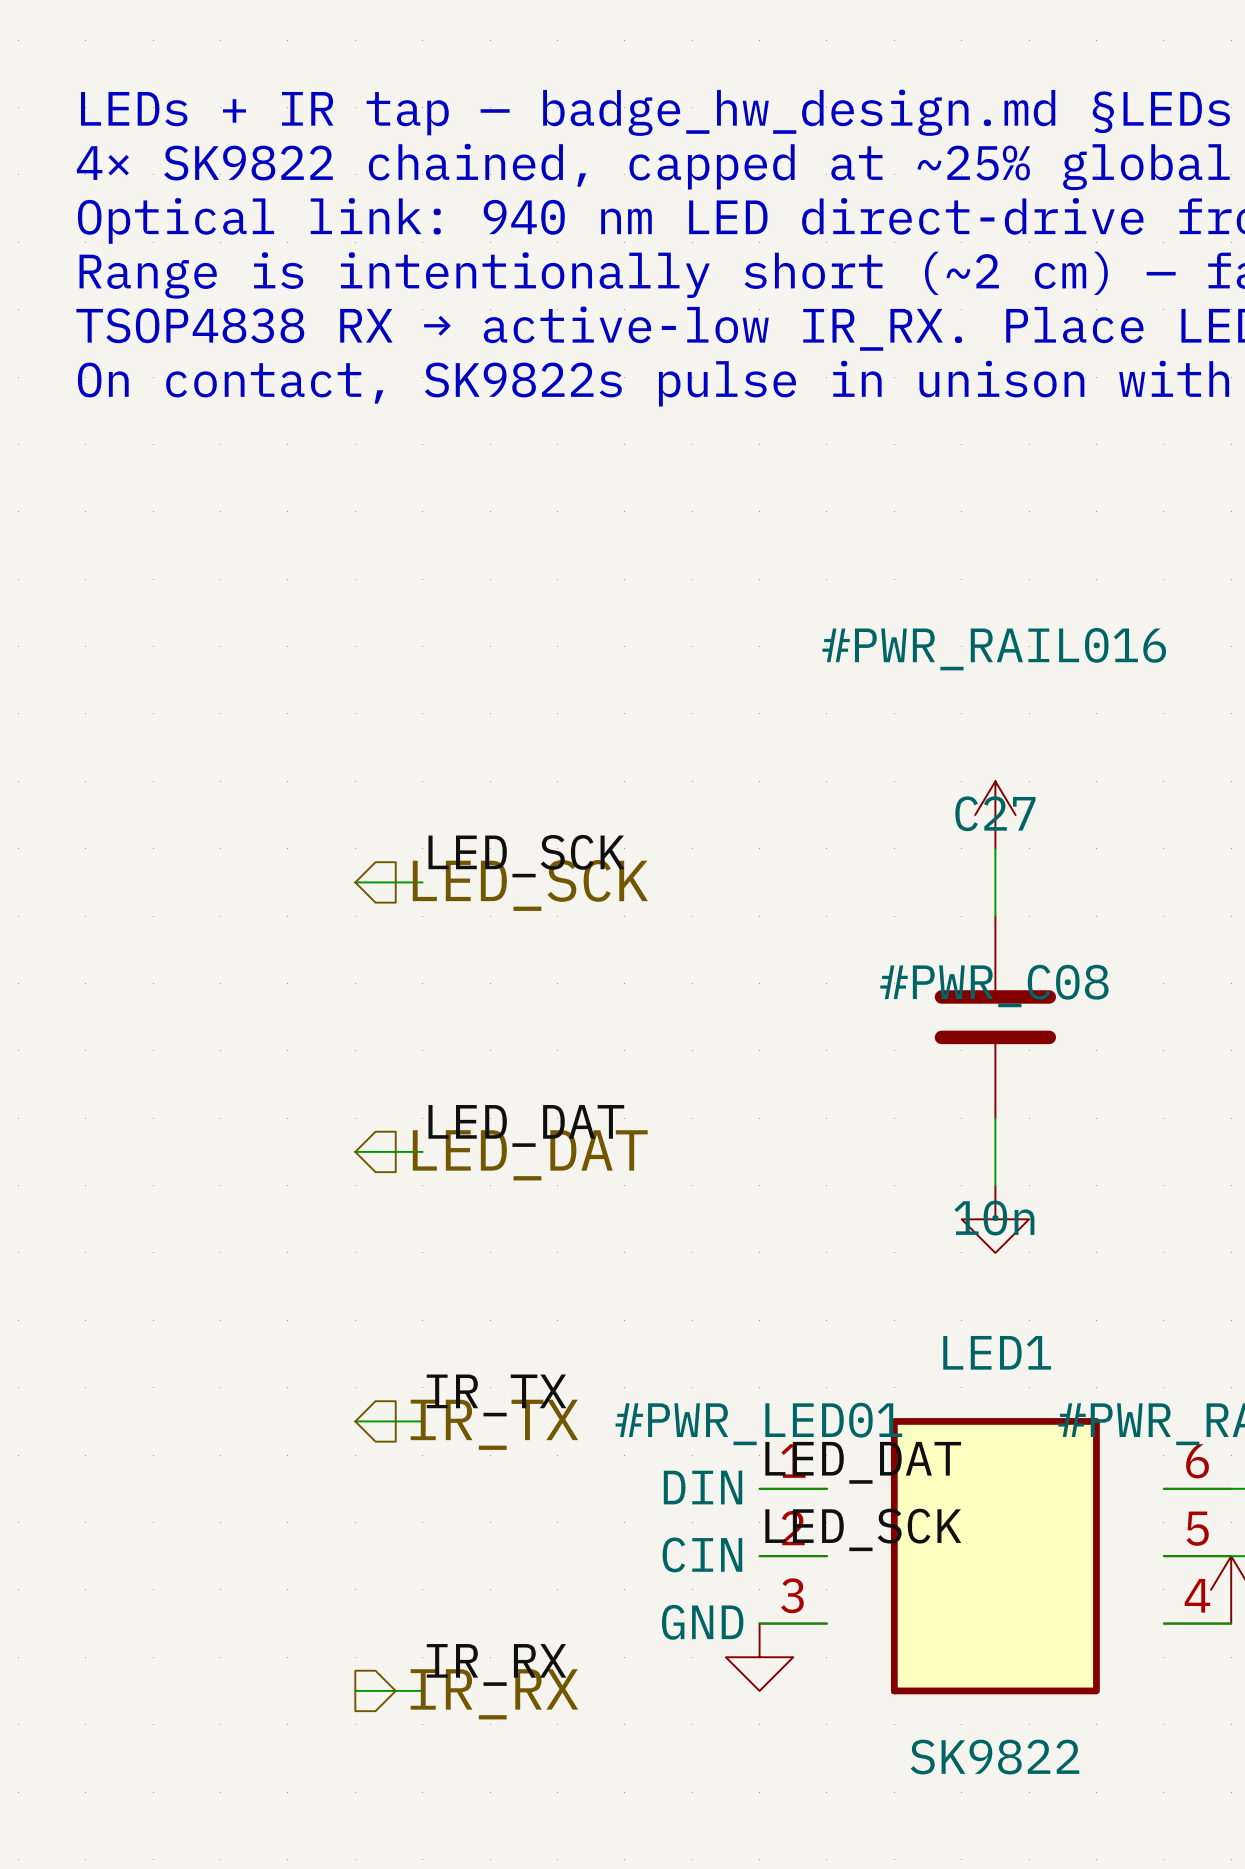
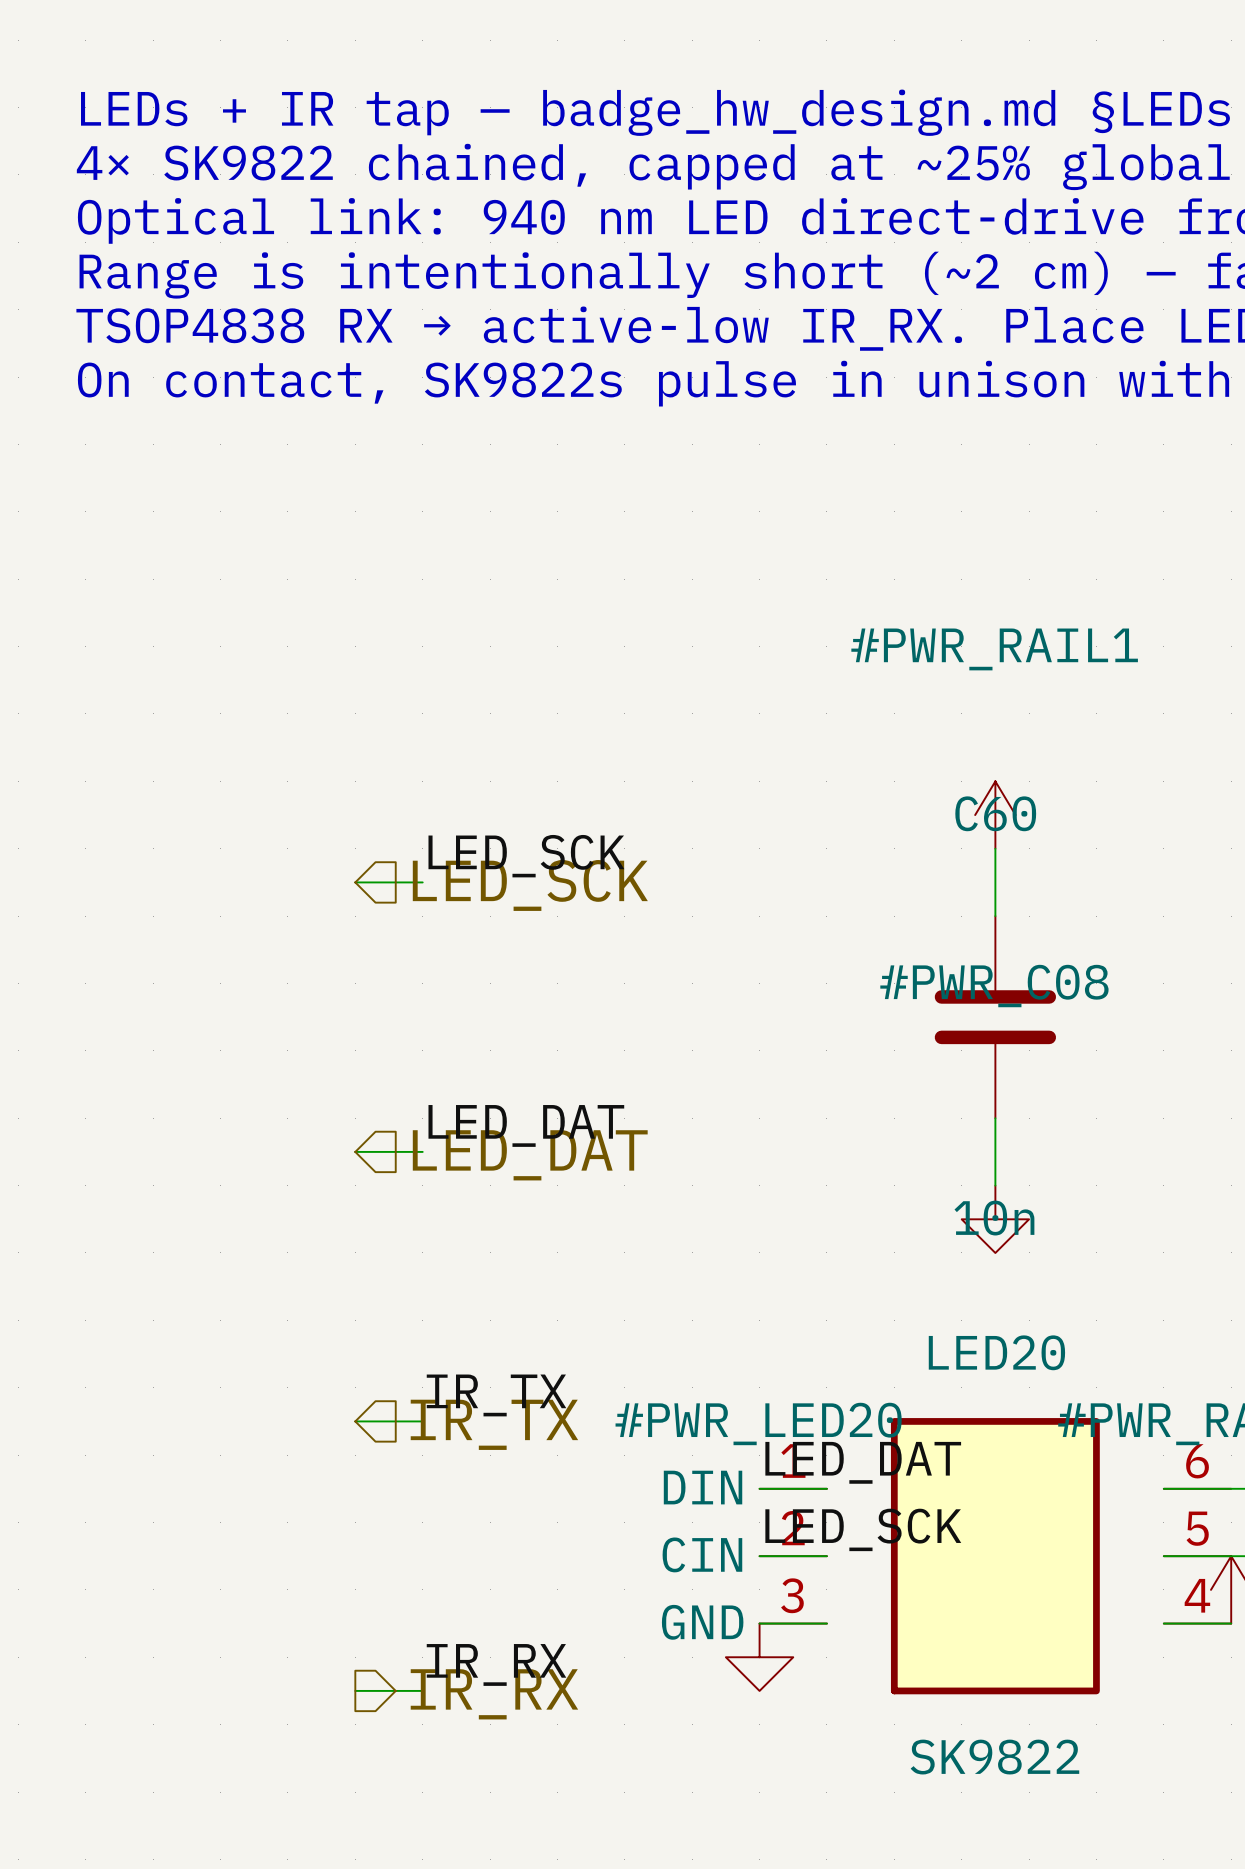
#PWR_RAIL016 name: #PWR_RAIL016 (994, 649) -> #PWR_RAIL1 (994, 649)
C27 name: C27 (995, 813) -> C60 (995, 813)
LED1 name: LED1 (997, 1352) -> LED20 (996, 1352)
#PWR_LED01 name: #PWR_LED01 (758, 1423) -> #PWR_LED20 (758, 1423)

